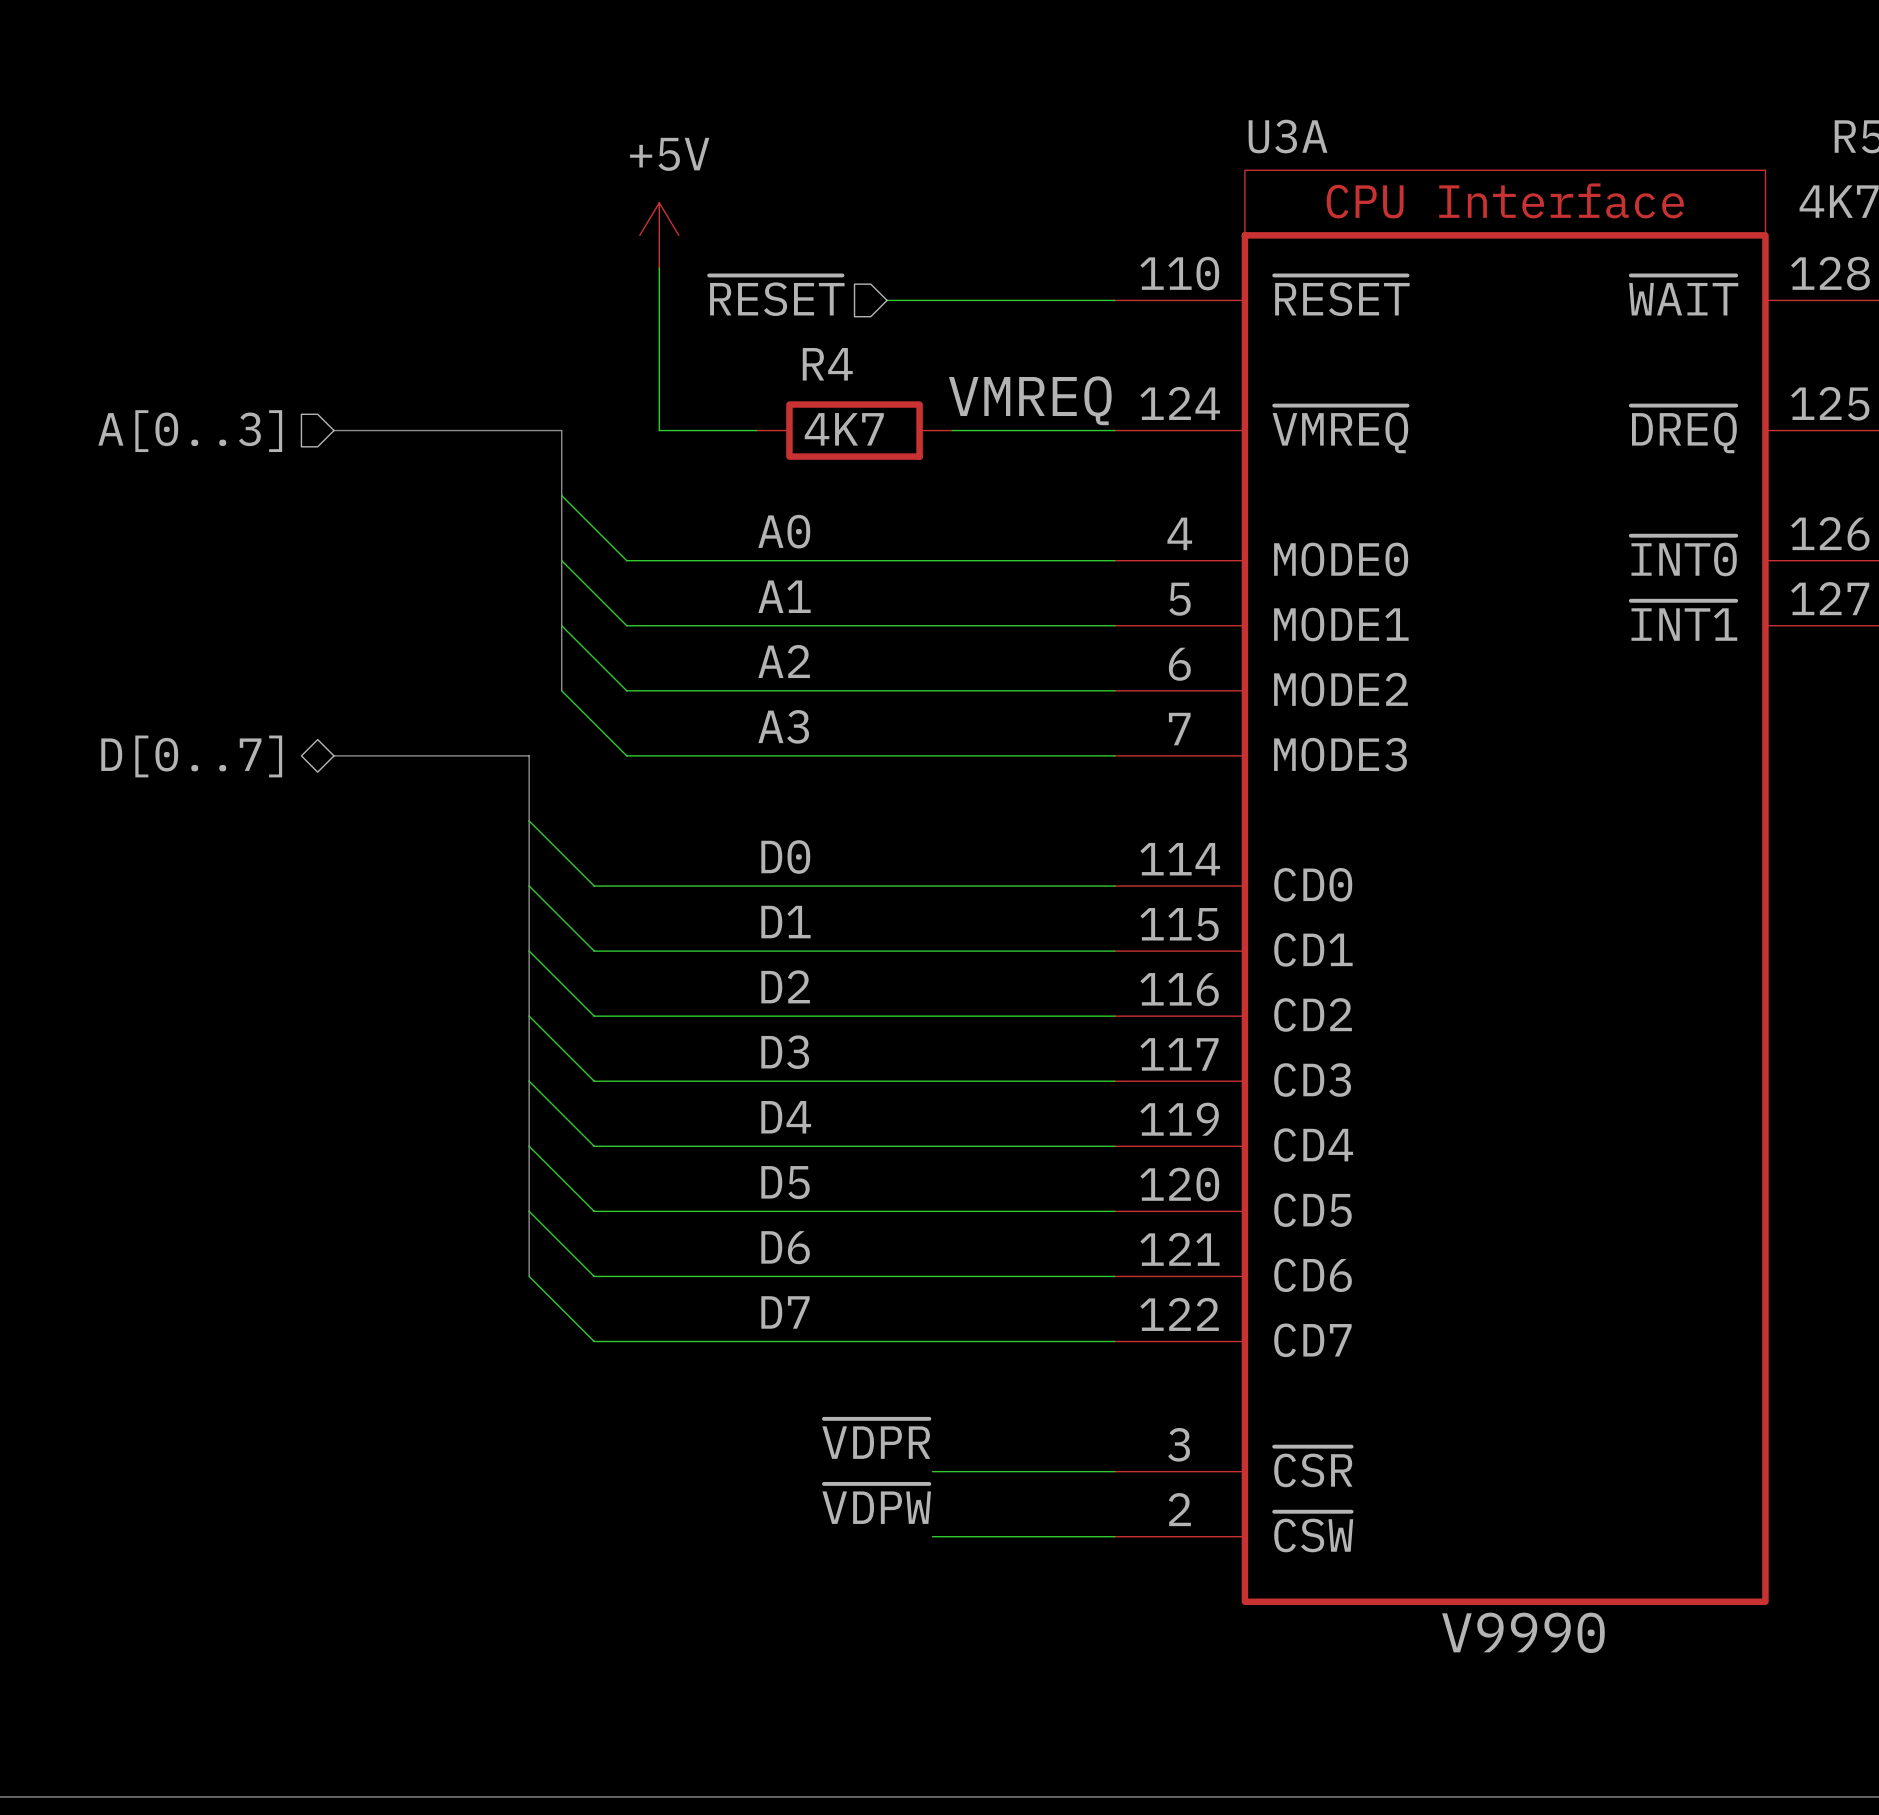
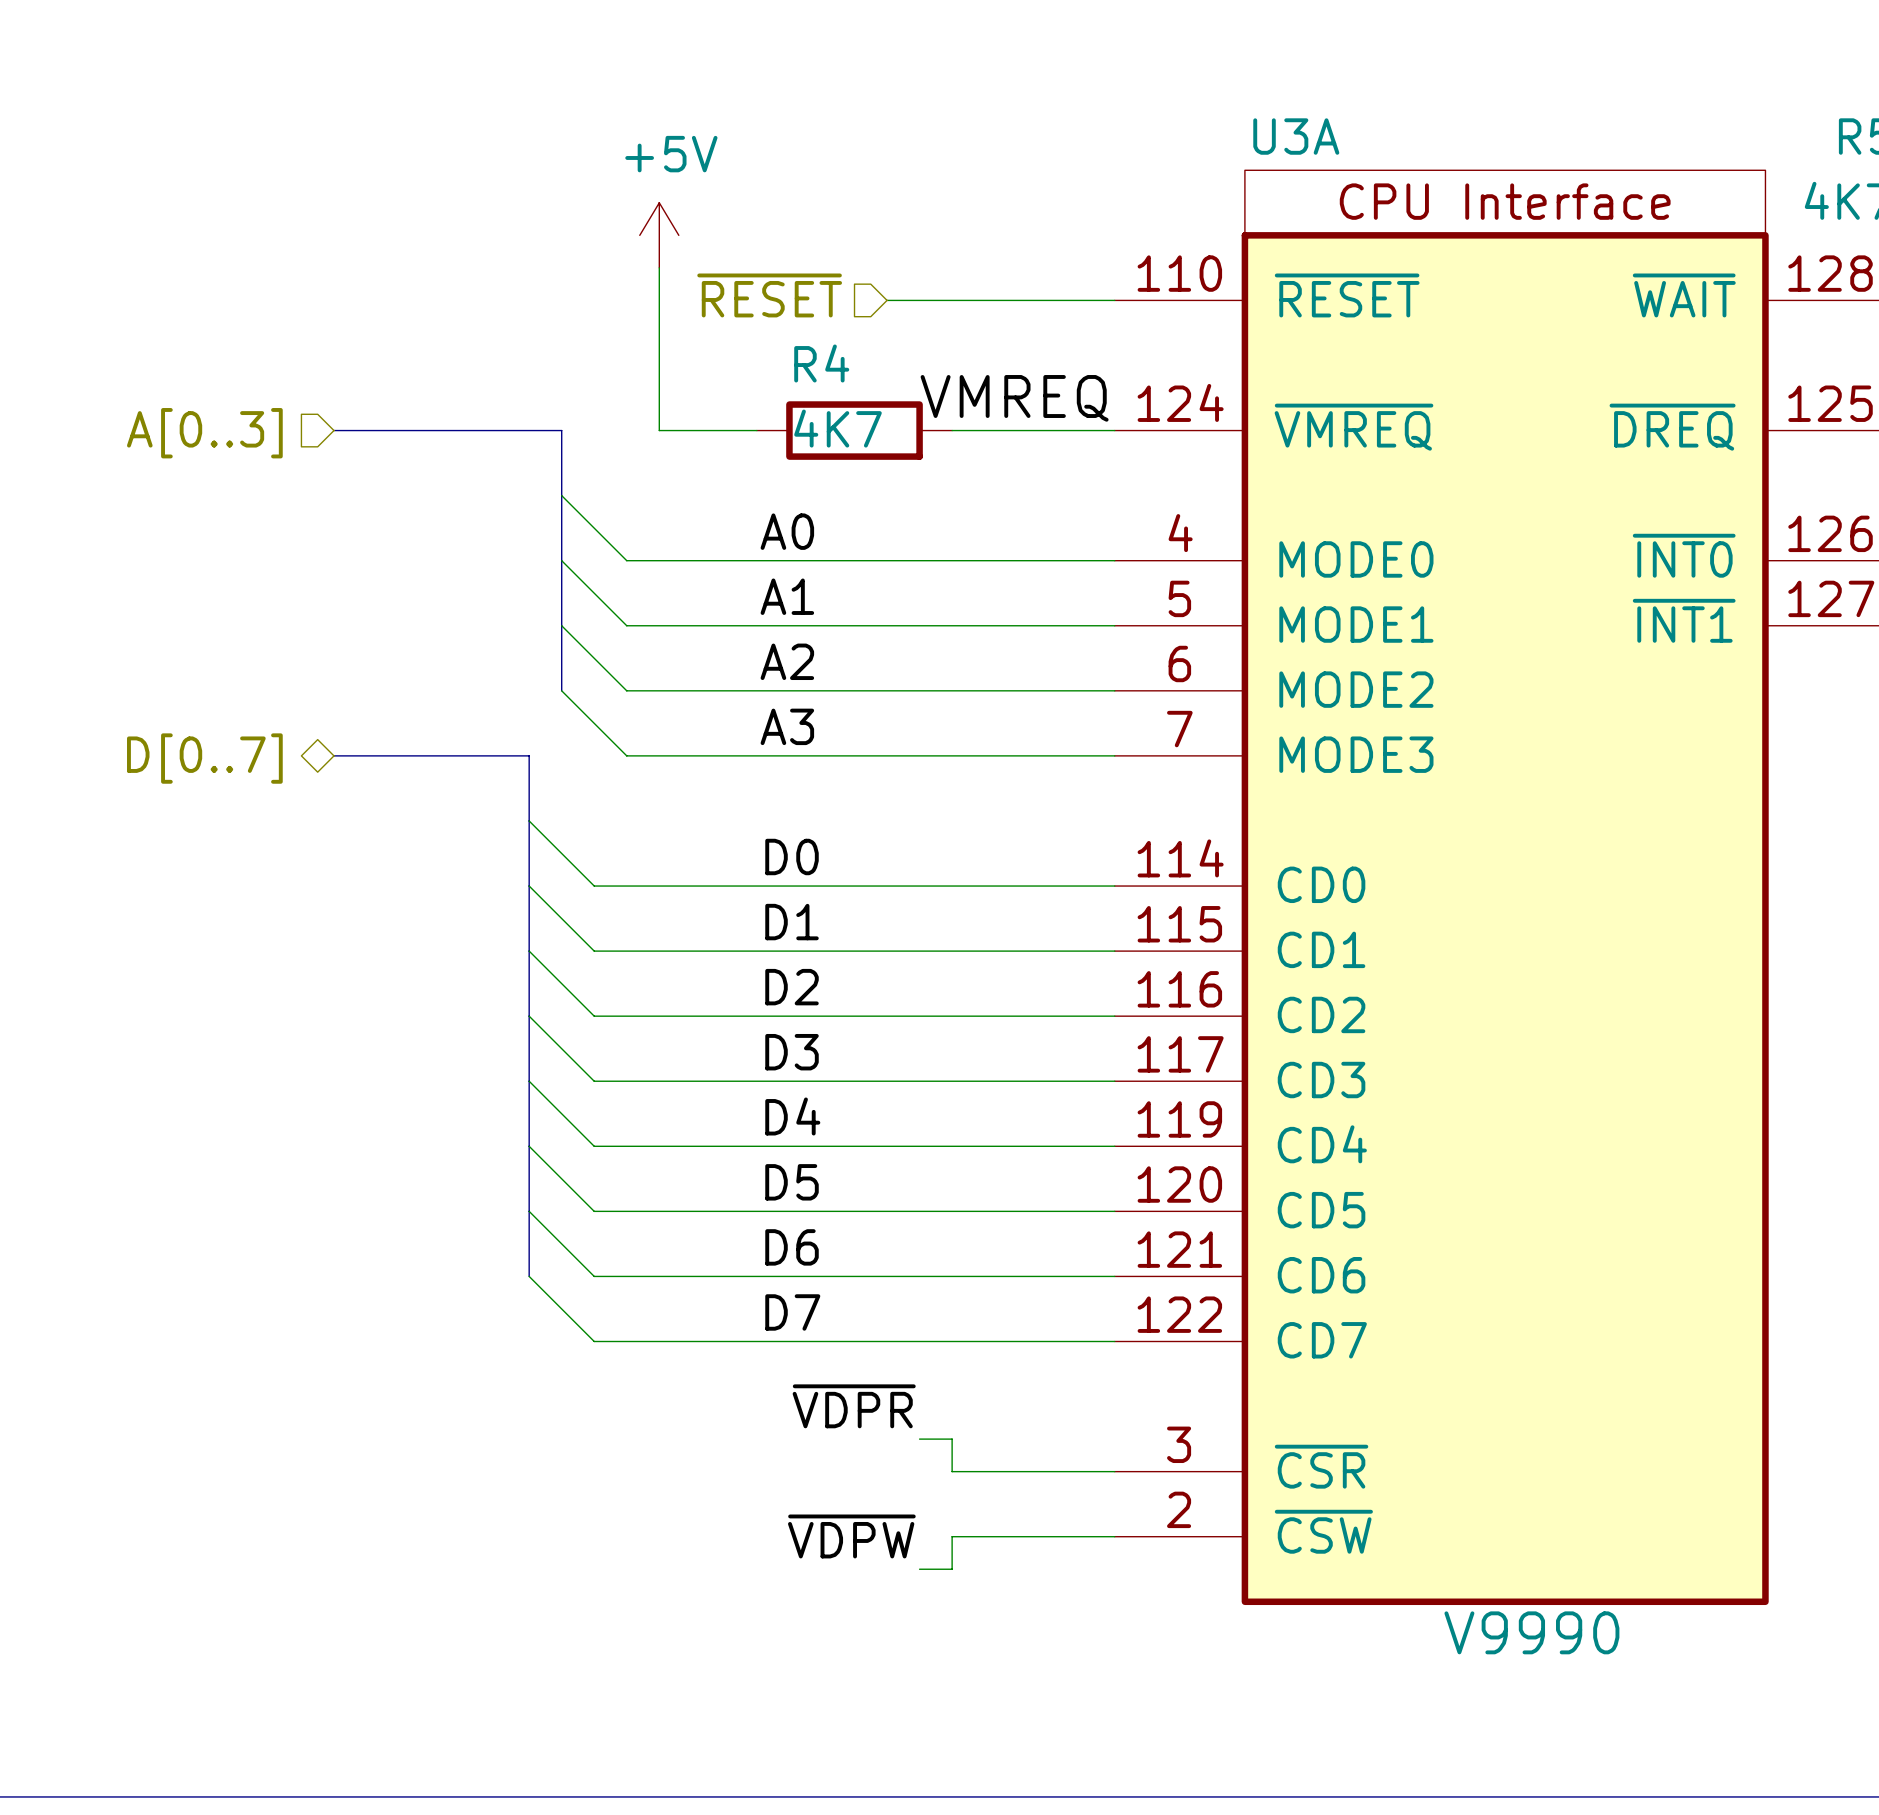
label position: ~{VDPR} (876, 1438) -> ~{VDPR} (854, 1406)
wire: (932, 1471) (952, 1471) -> (919, 1439) (952, 1439) (952, 1471)
label position: ~{VDPW} (876, 1503) -> ~{VDPW} (851, 1536)
wire: (932, 1536) (952, 1536) -> (919, 1569) (952, 1569) (952, 1536)

